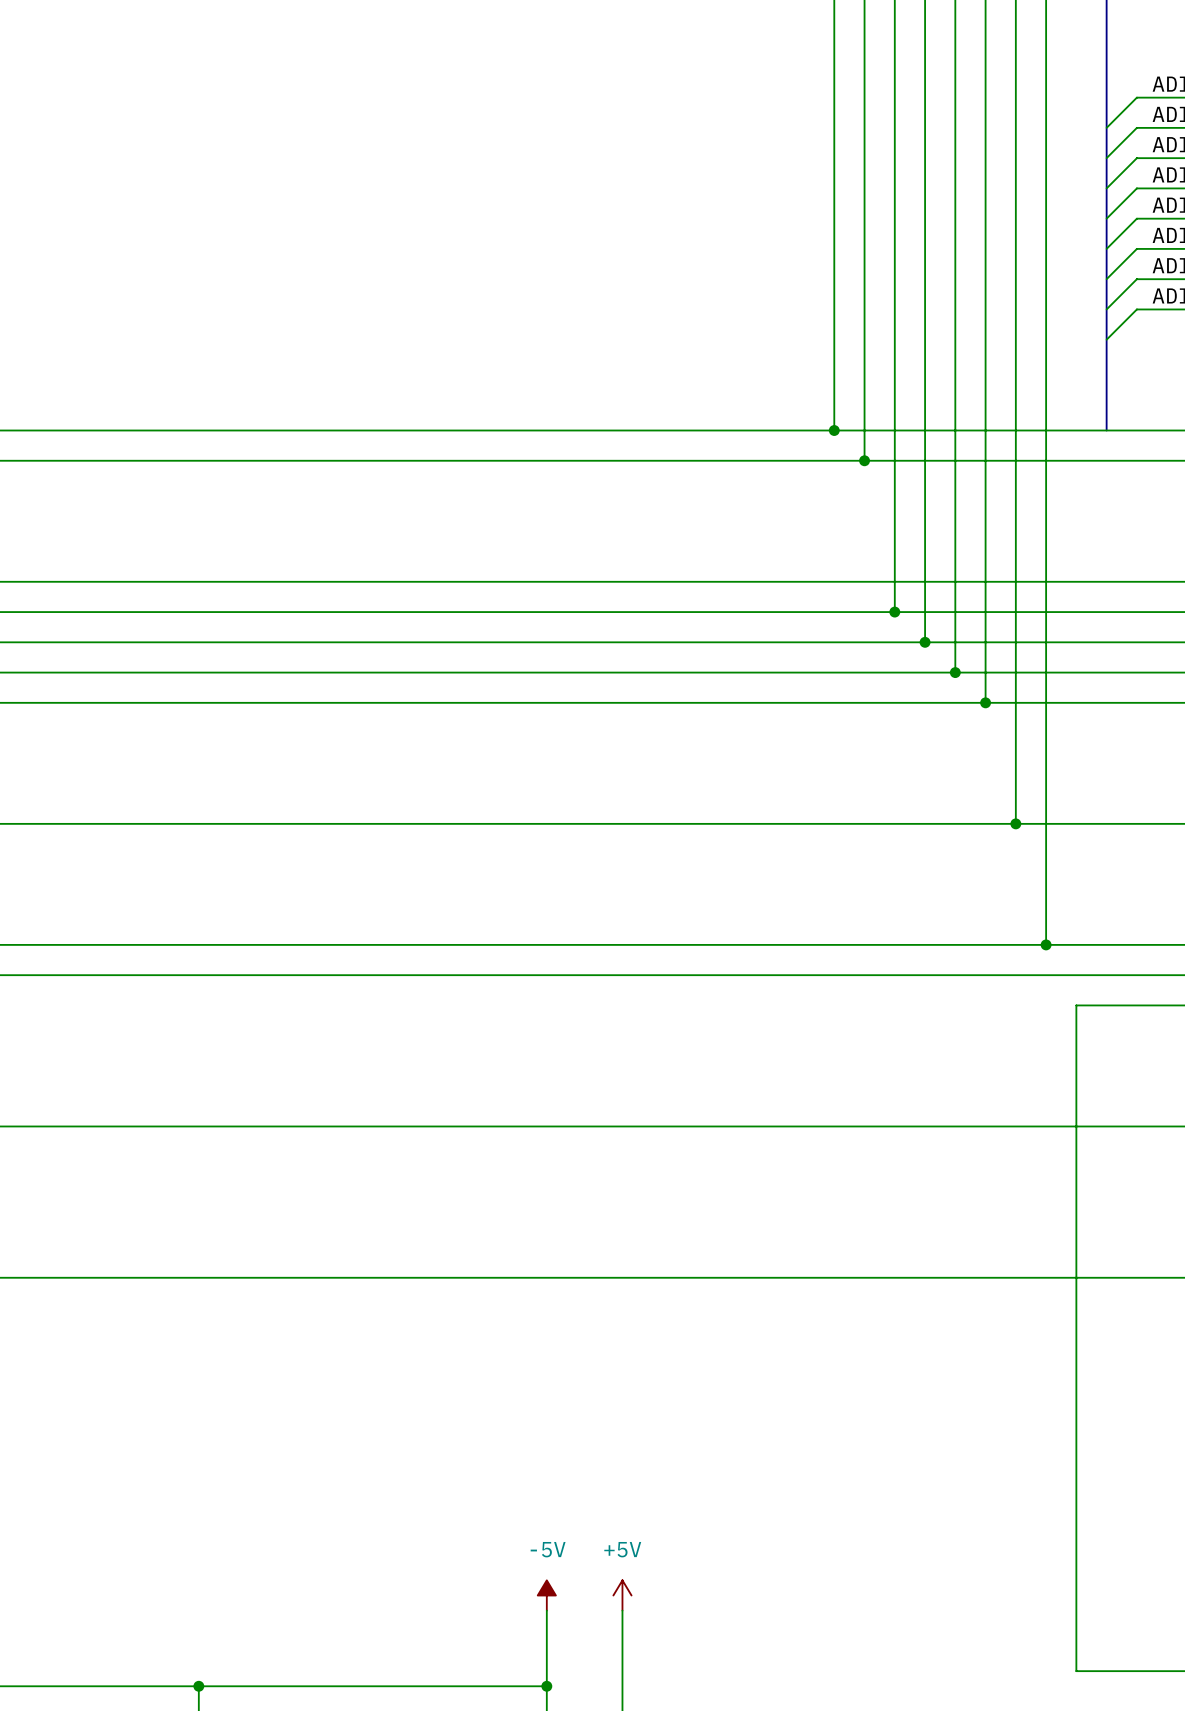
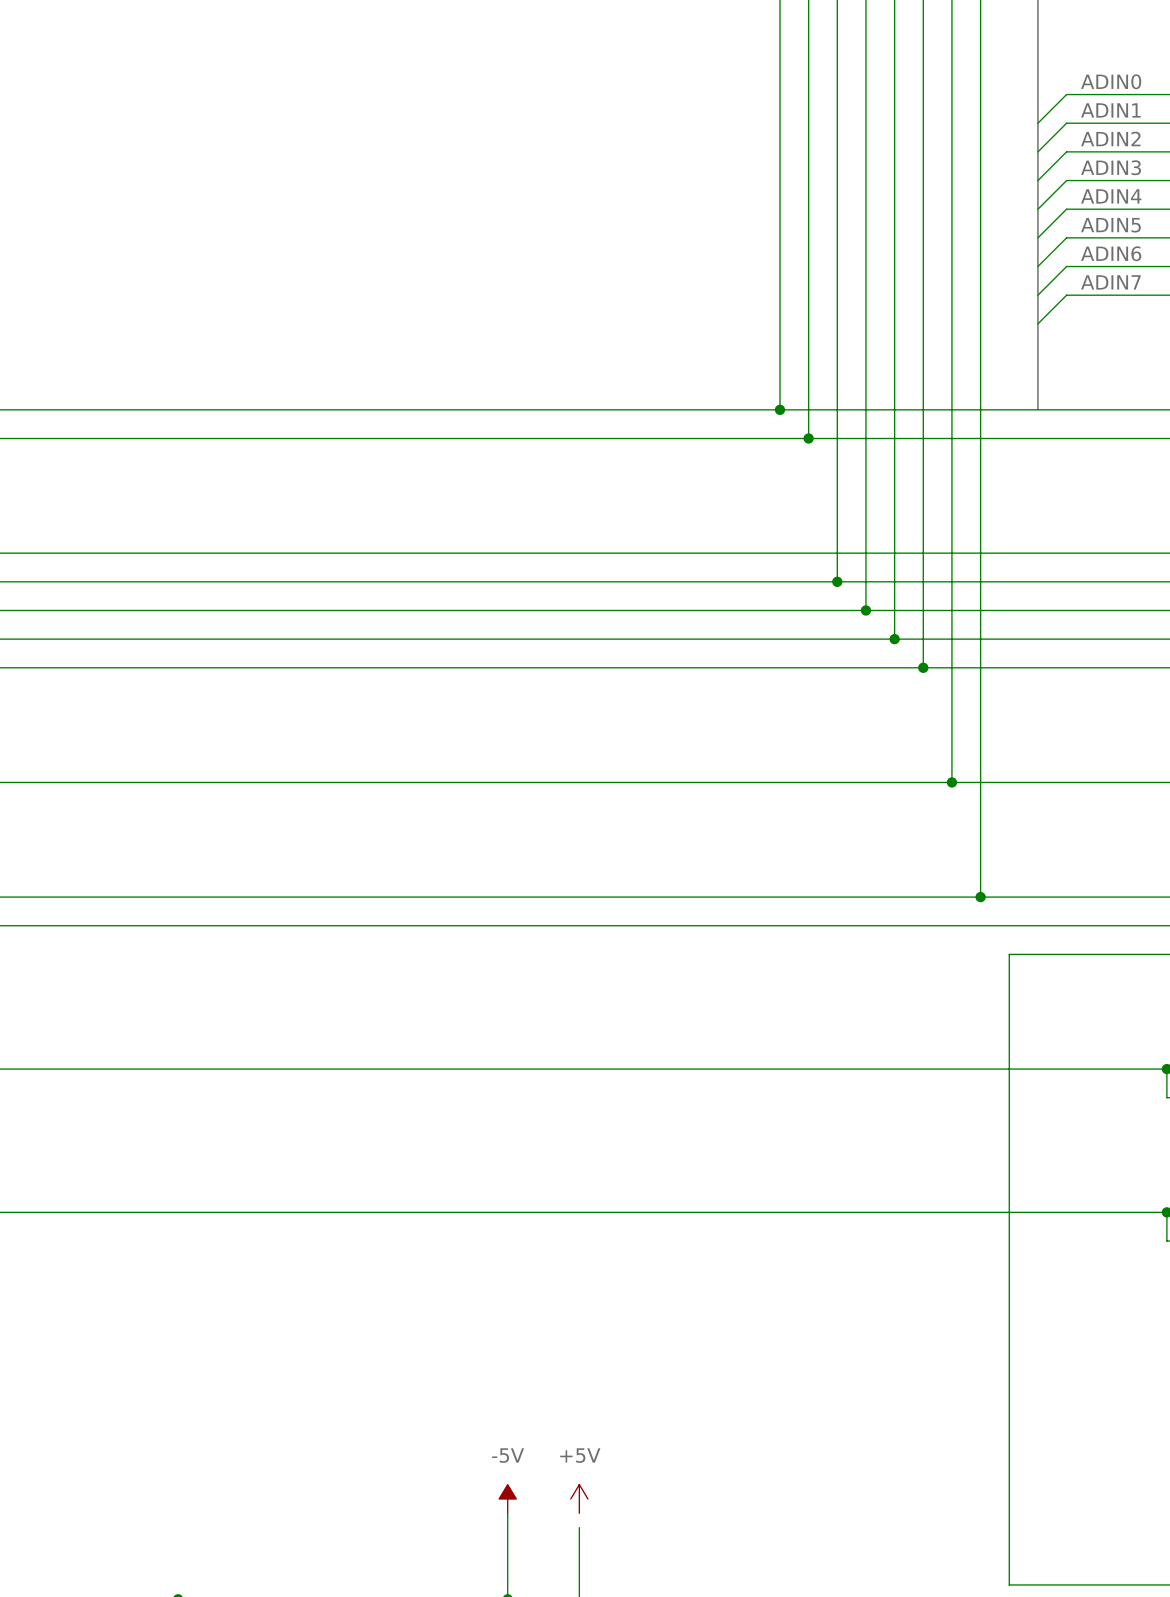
power symbol position: -5V (546, 1595) -> -5V (507, 1498)
power symbol position: +5V (622, 1595) -> +5V (579, 1498)

